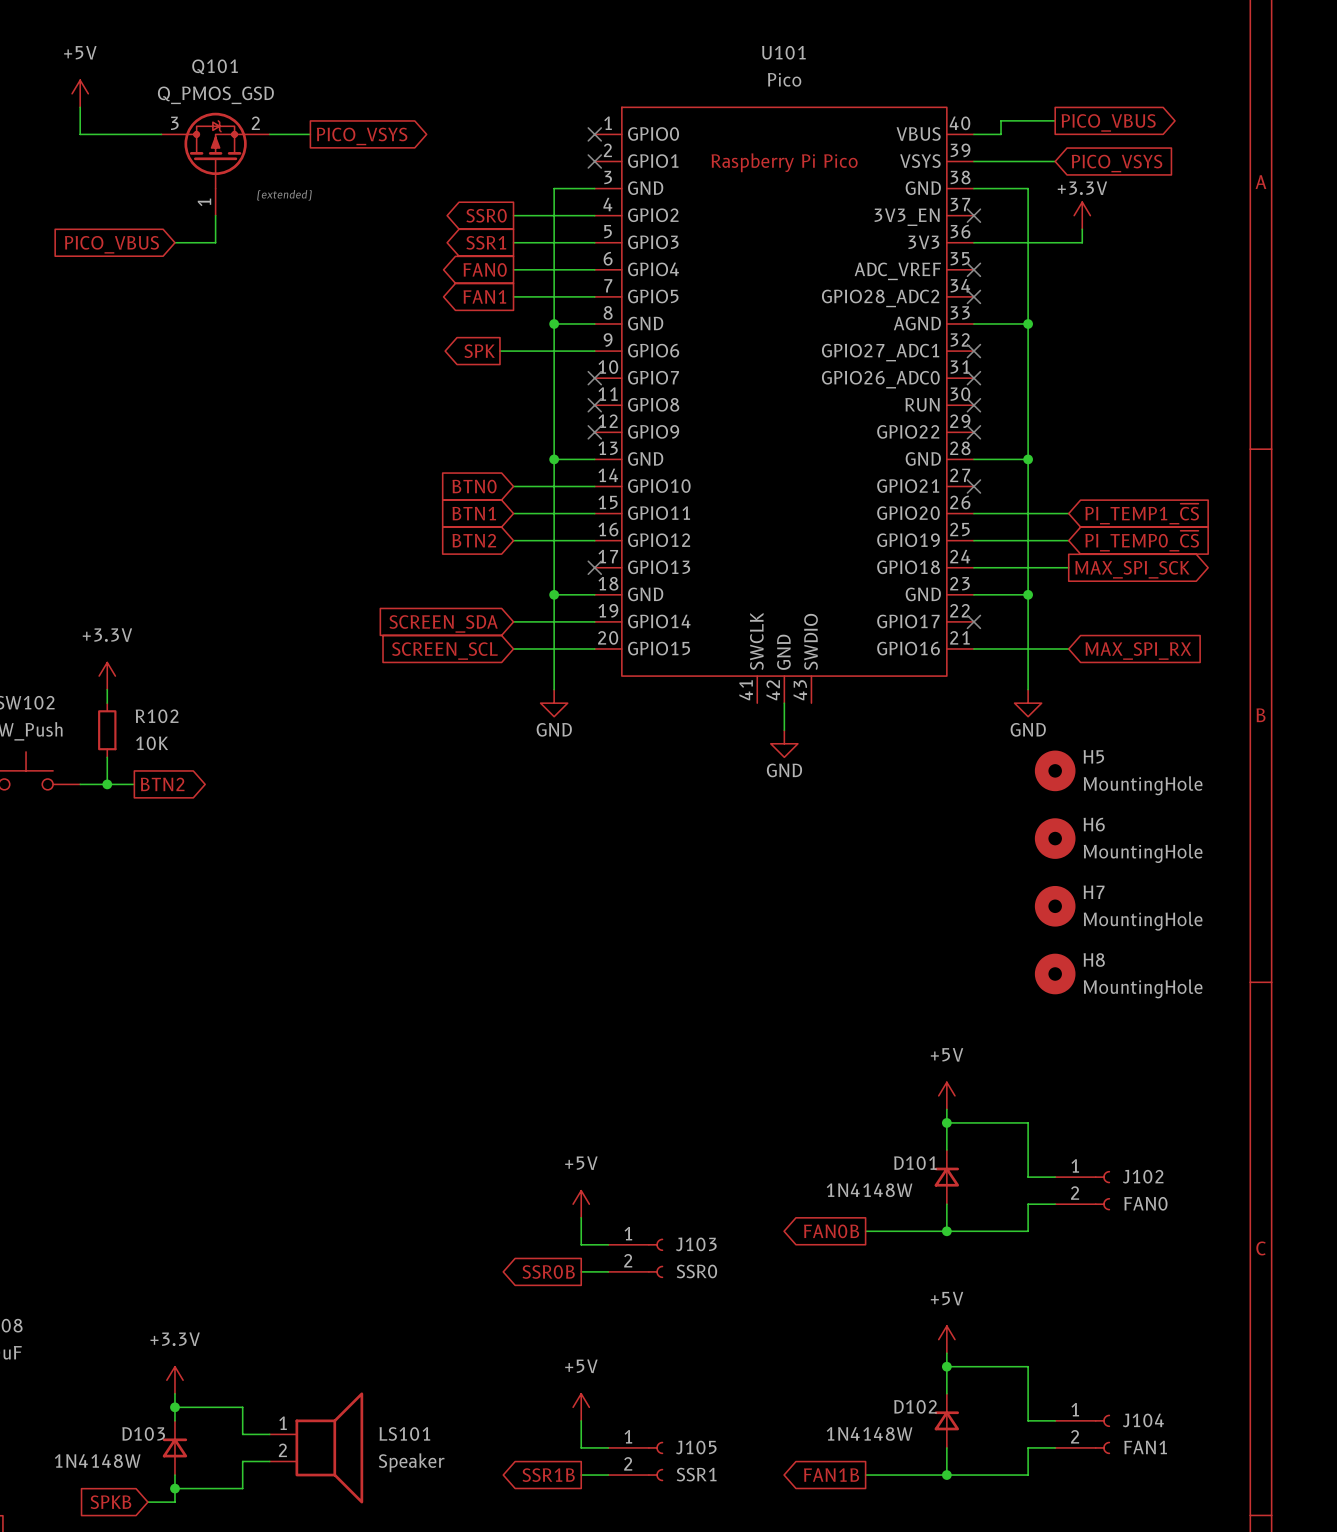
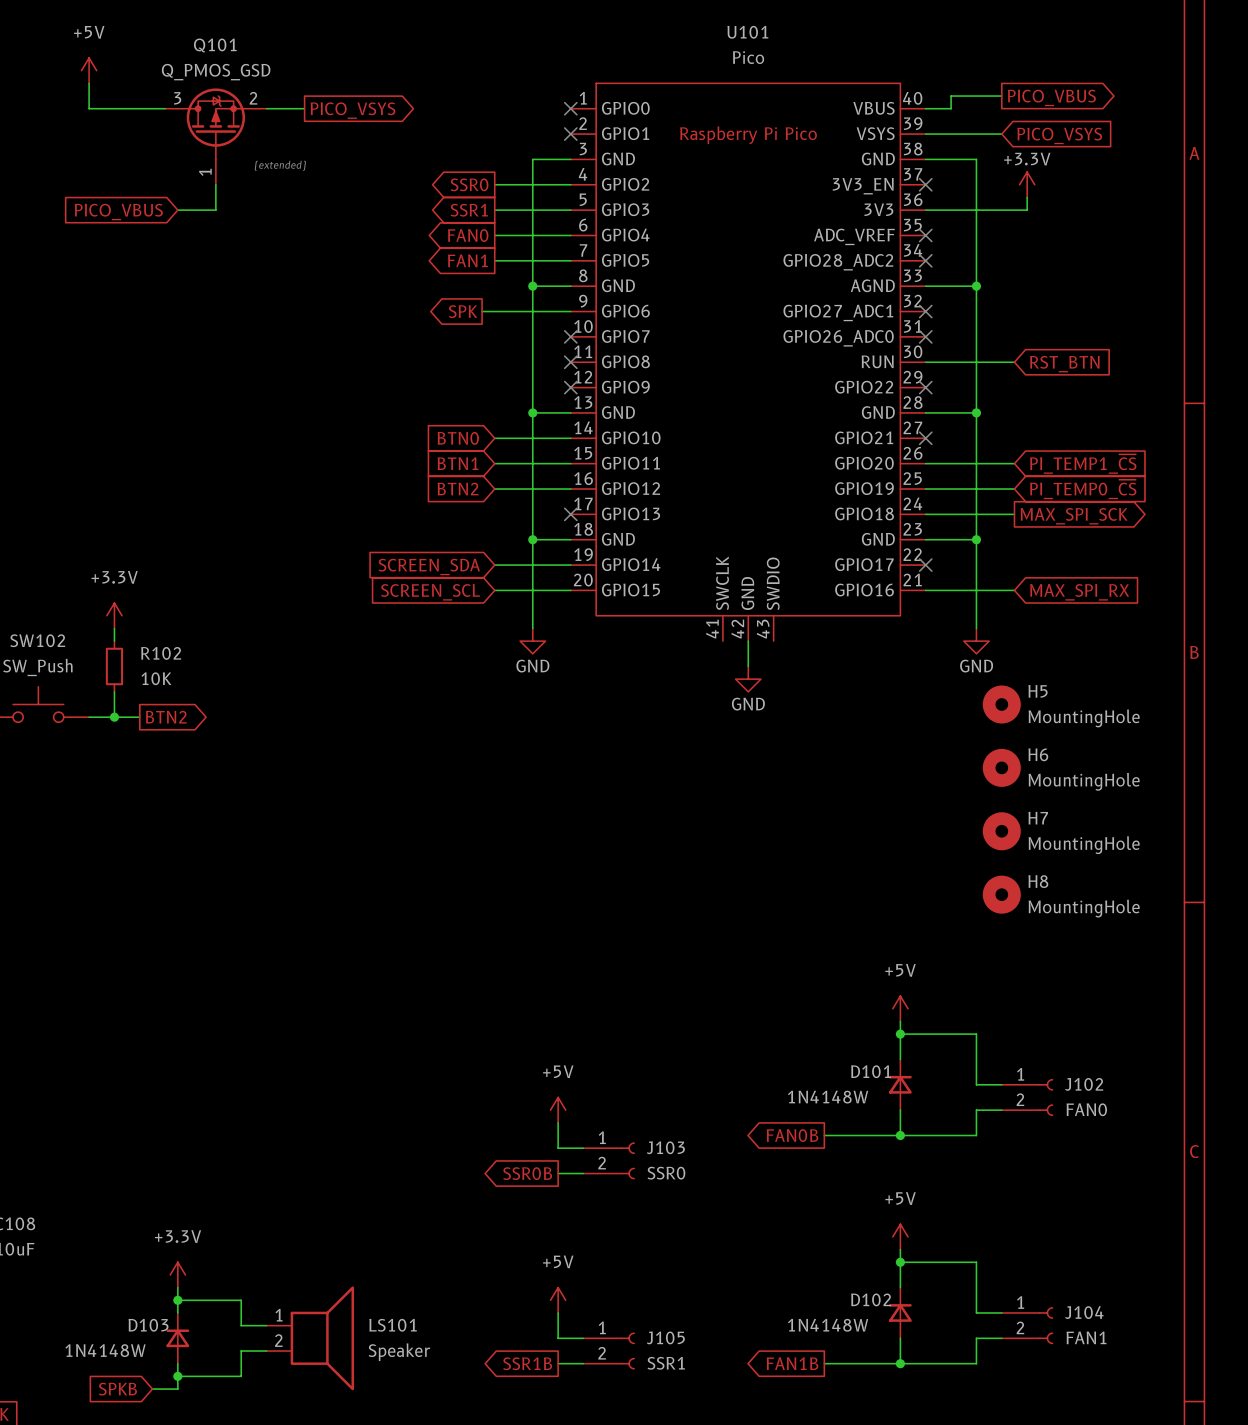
wire: none -> (925, 362) (1014, 362)
no-connect mark: (973, 405) -> none
global label: none -> RST_BTN (1064, 364)

